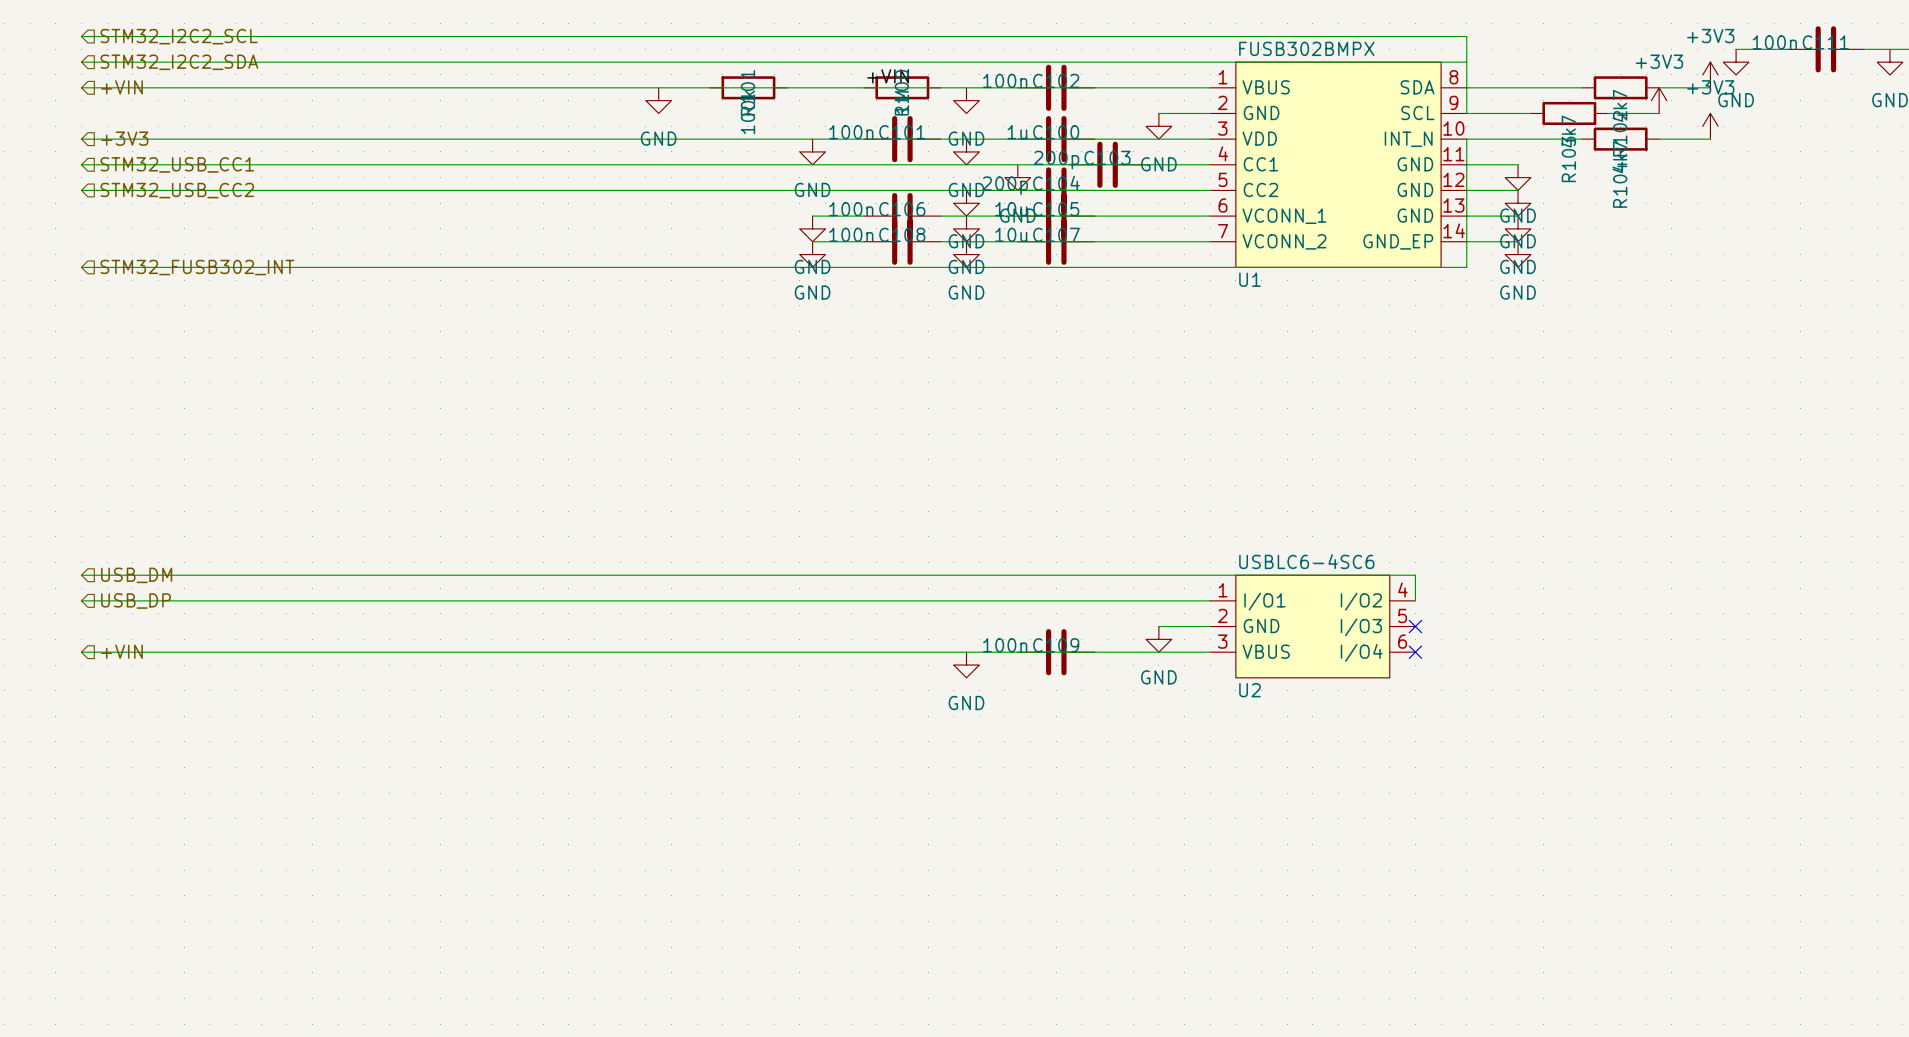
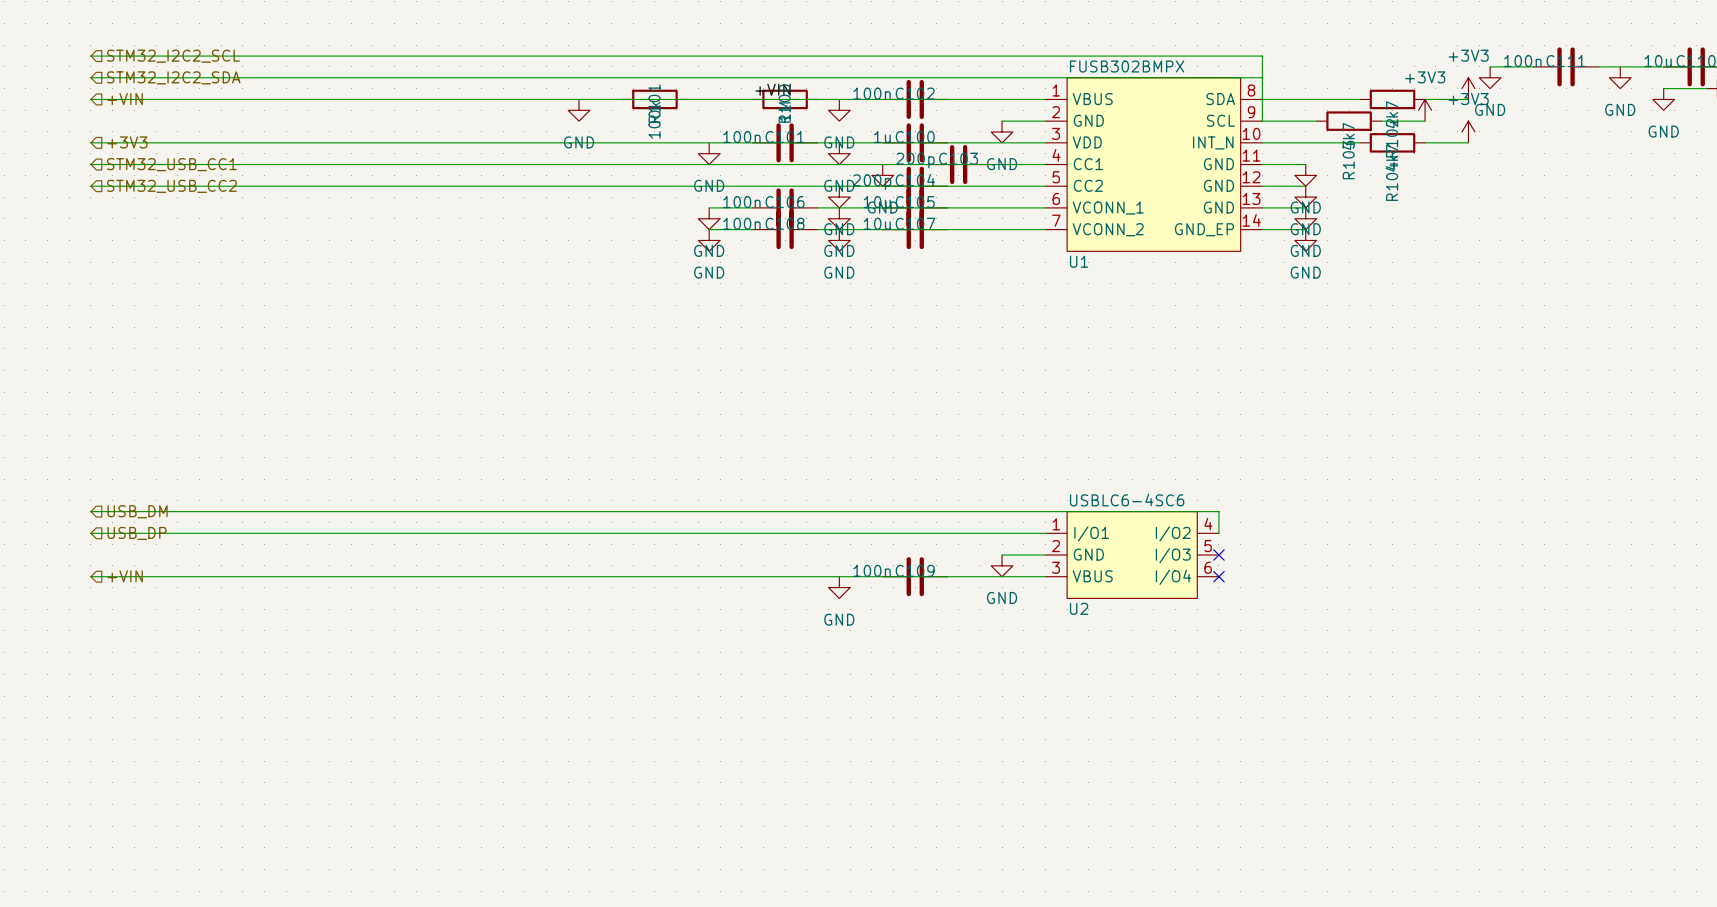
wire: (1466, 139) (1466, 267) (81, 267) -> none
hierarchical label: STM32_FUSB302_INT (197, 267) -> none

